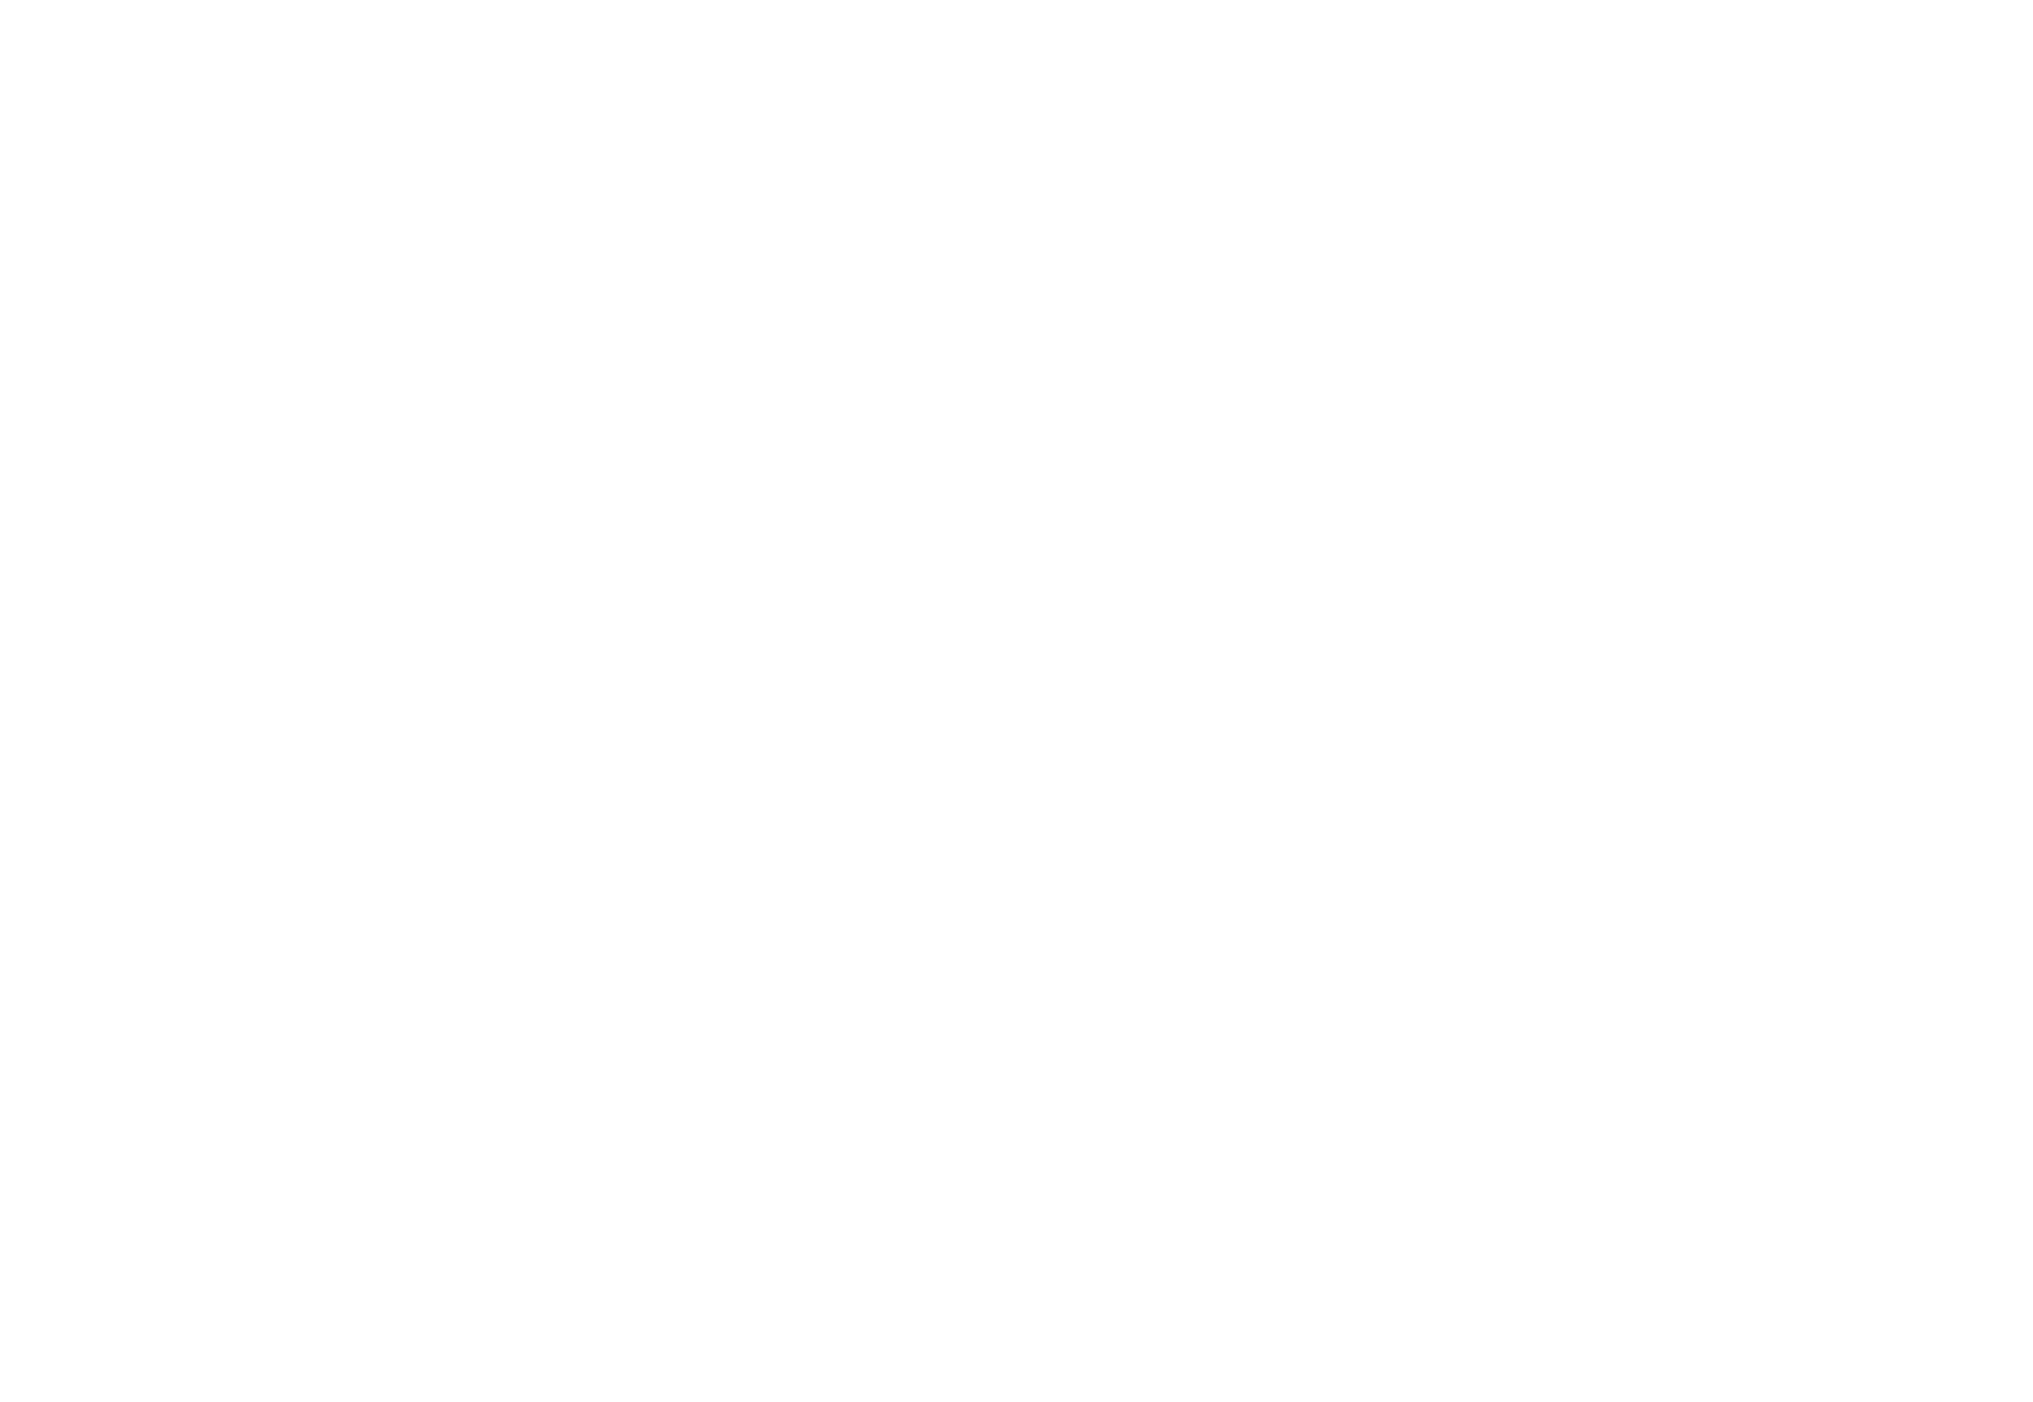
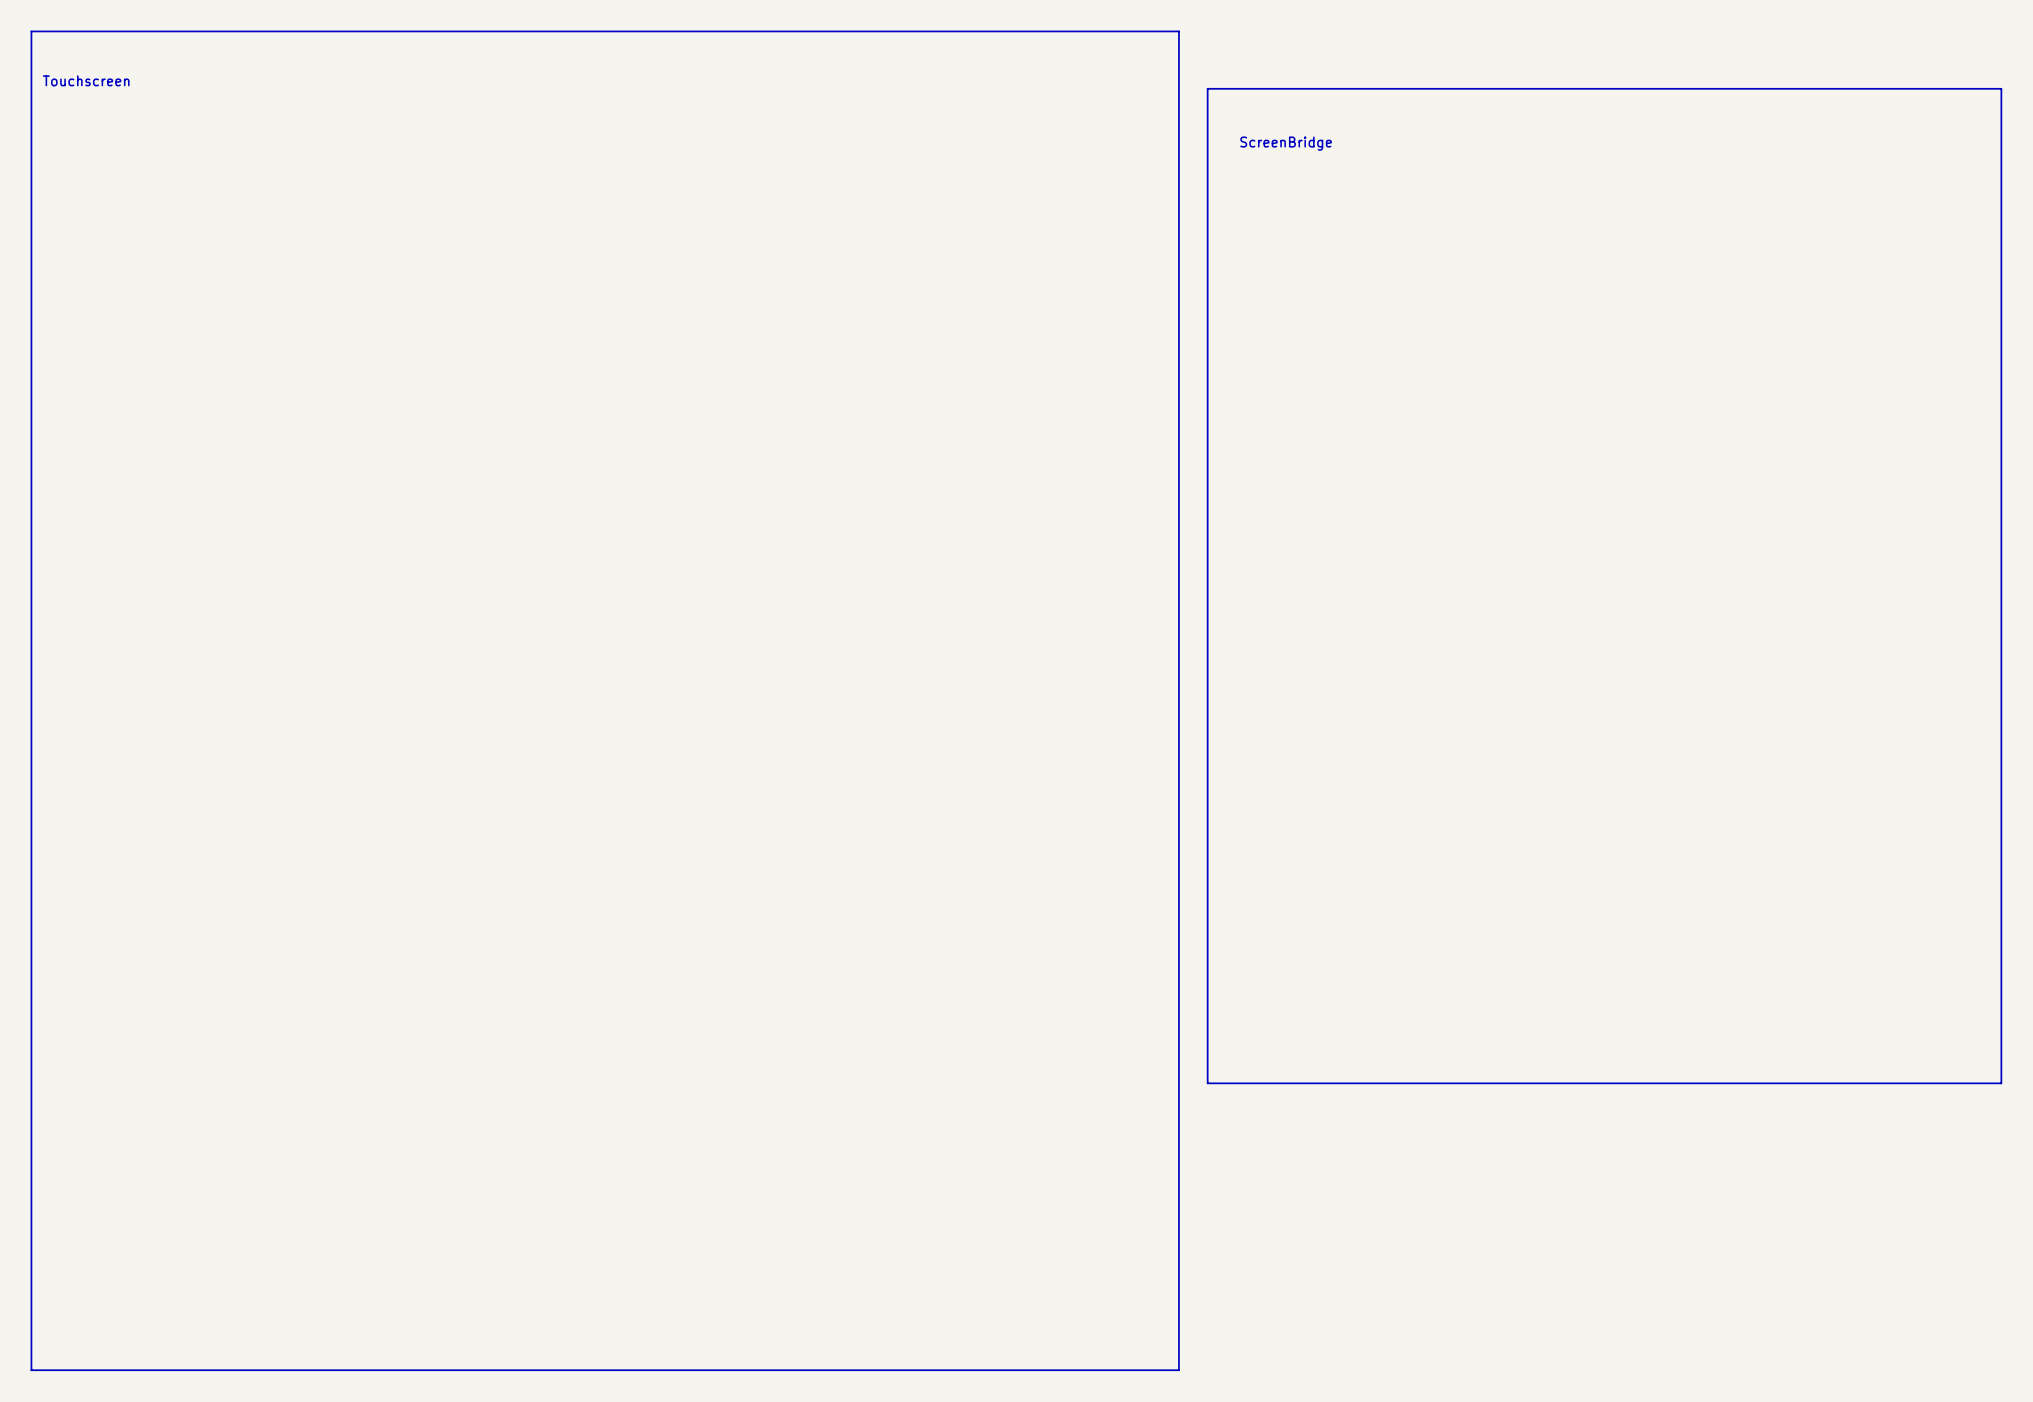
line: none -> (31, 31) (1178, 31) (1178, 1370) (31, 1370) (31, 31)
text: none -> Touchscreen (86, 80)
line: none -> (1207, 88) (2001, 88) (2001, 1083) (1207, 1083) (1207, 88)
text: none -> ScreenBridge (1286, 143)

